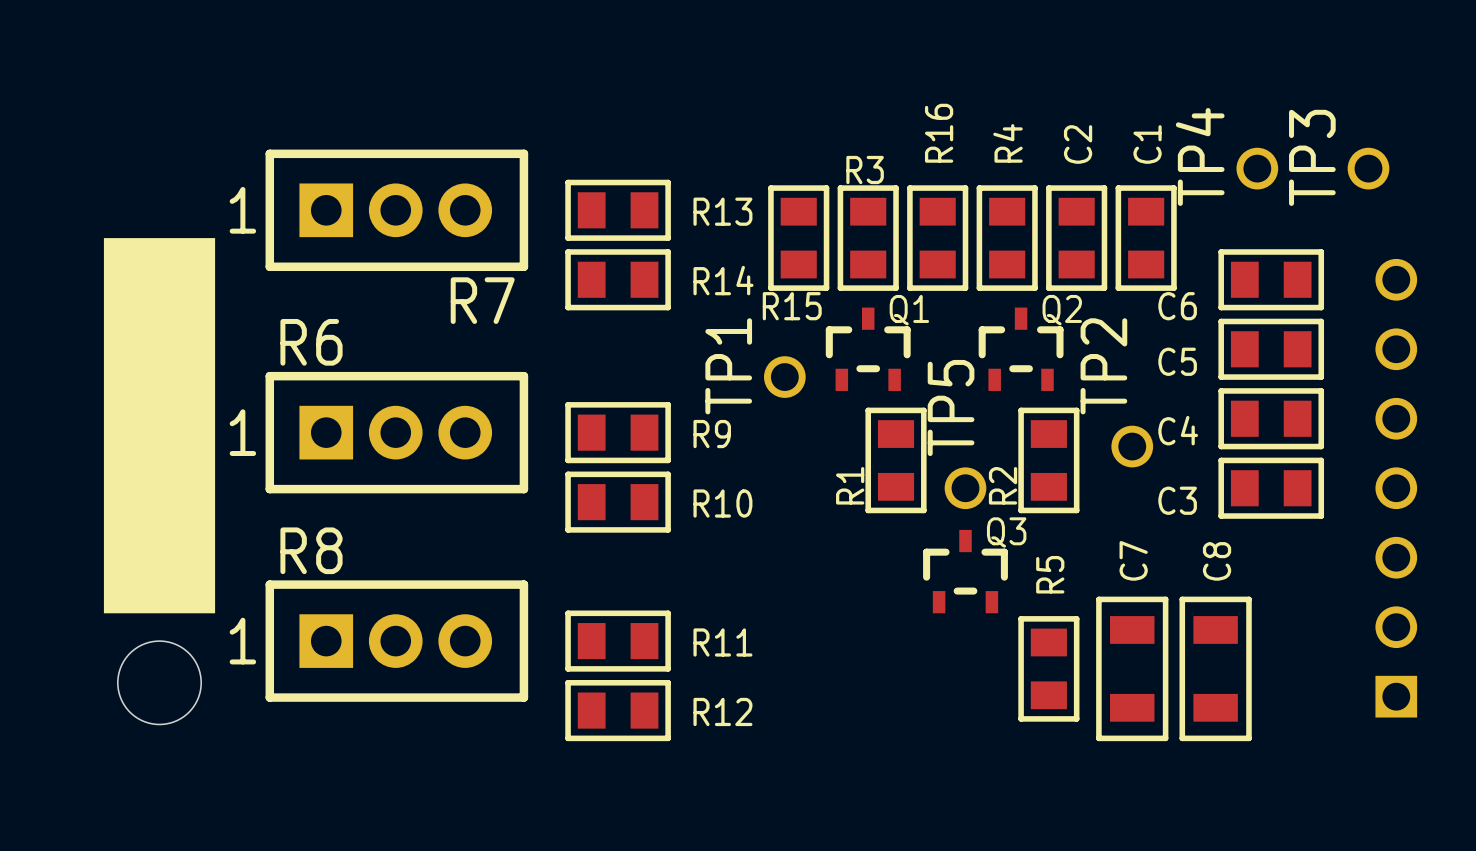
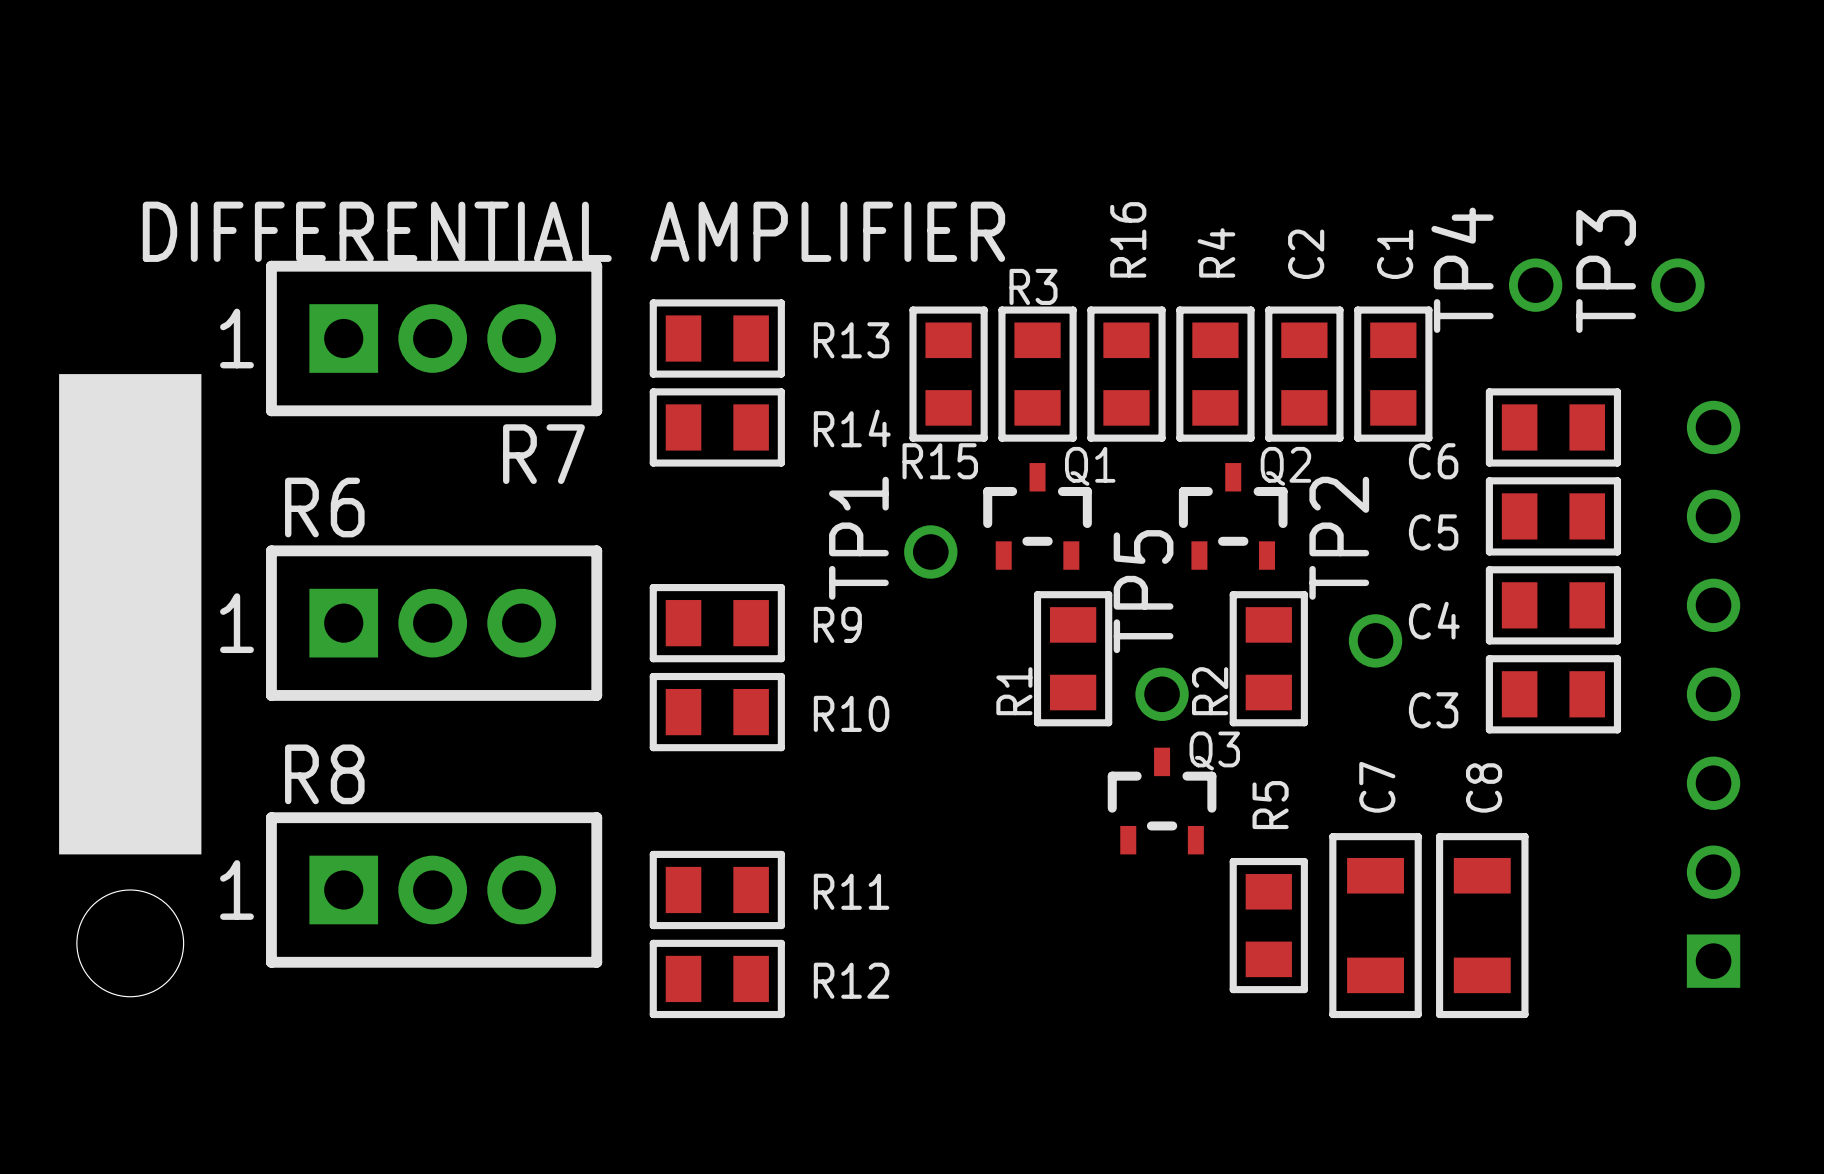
part text: none -> DIFFERENTIAL AMPLIFIER (573, 231)

